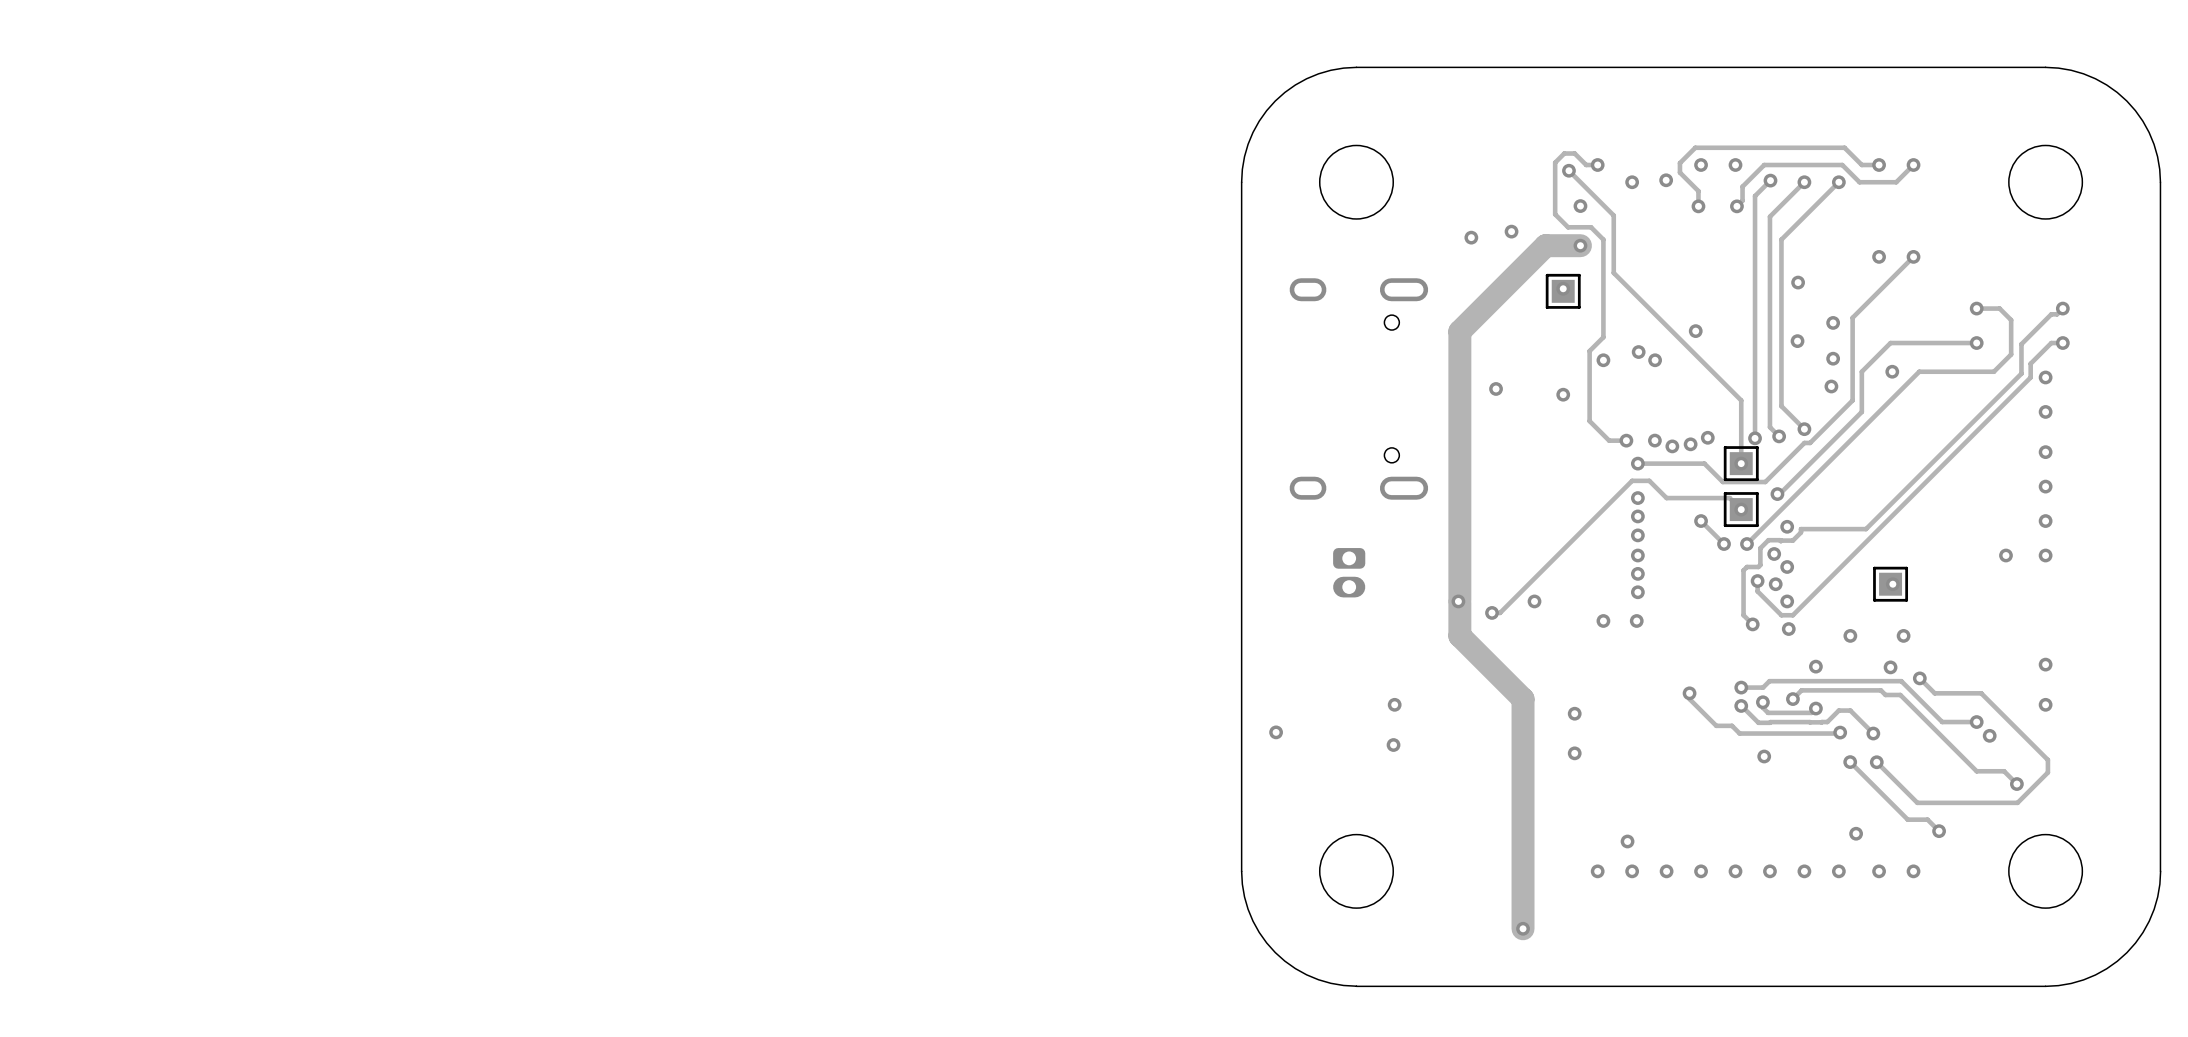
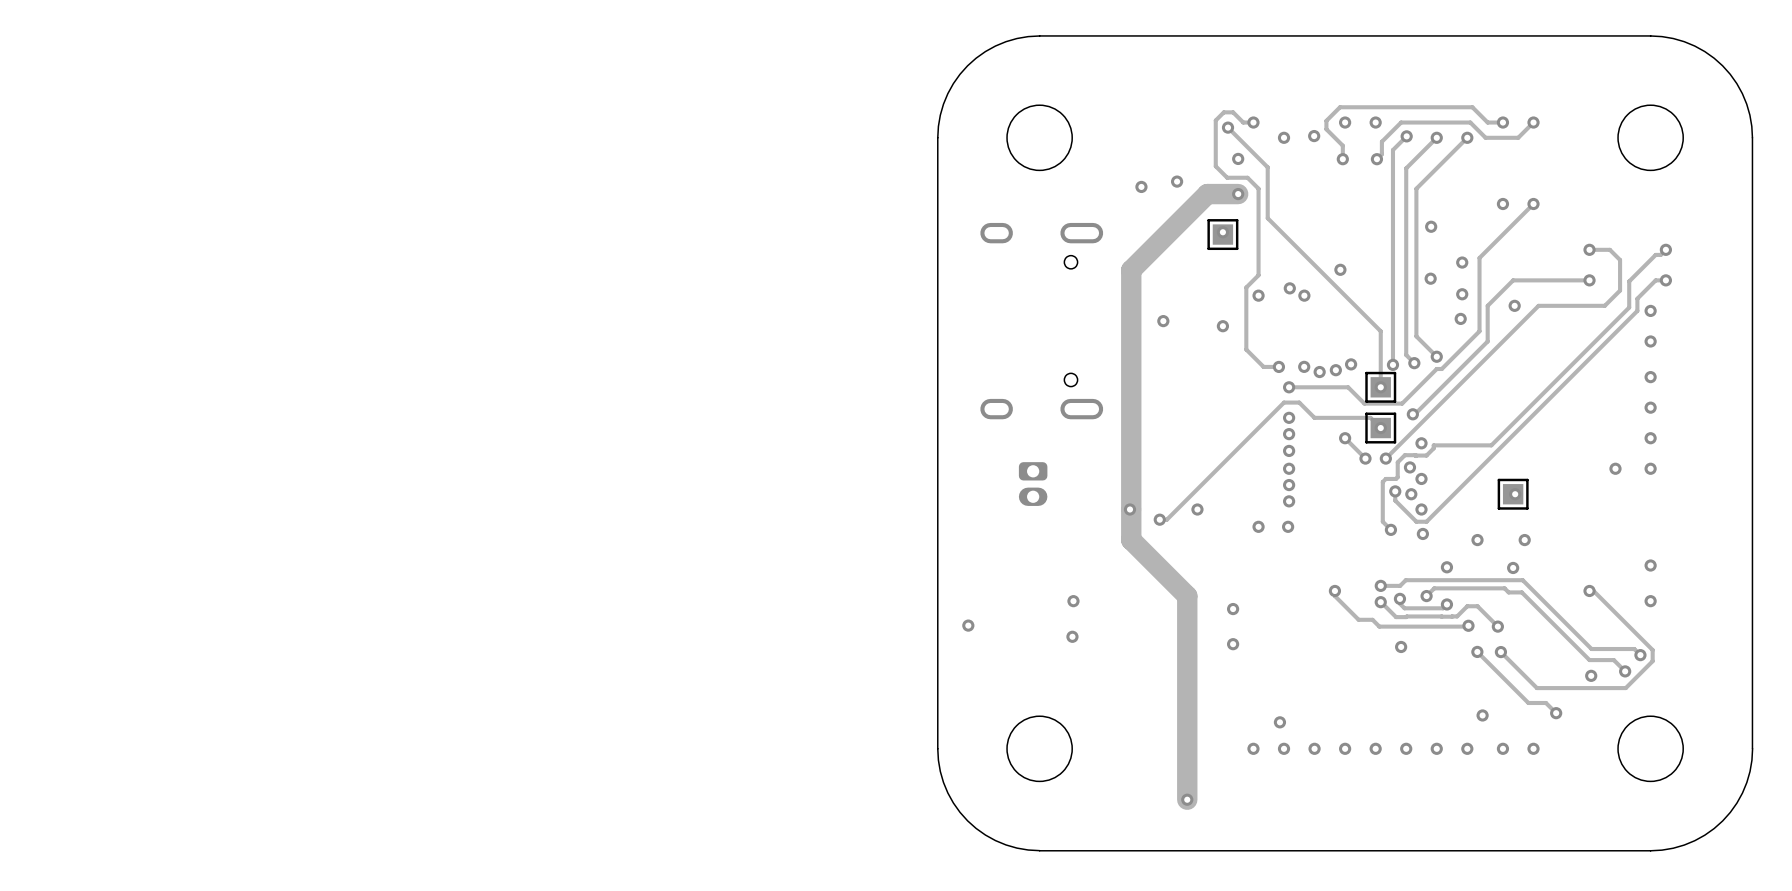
track: (1919, 678) (1934, 693) (1976, 693) -> none
via: (1919, 678) -> none
via: none -> (1589, 590)
track: (1976, 722) (1942, 722) -> (1640, 655) (1634, 649) (1591, 649) (1558, 616)
via: (1976, 722) -> none
via: (1989, 735) -> none
via: none -> (1640, 655)
via: none -> (1591, 675)

